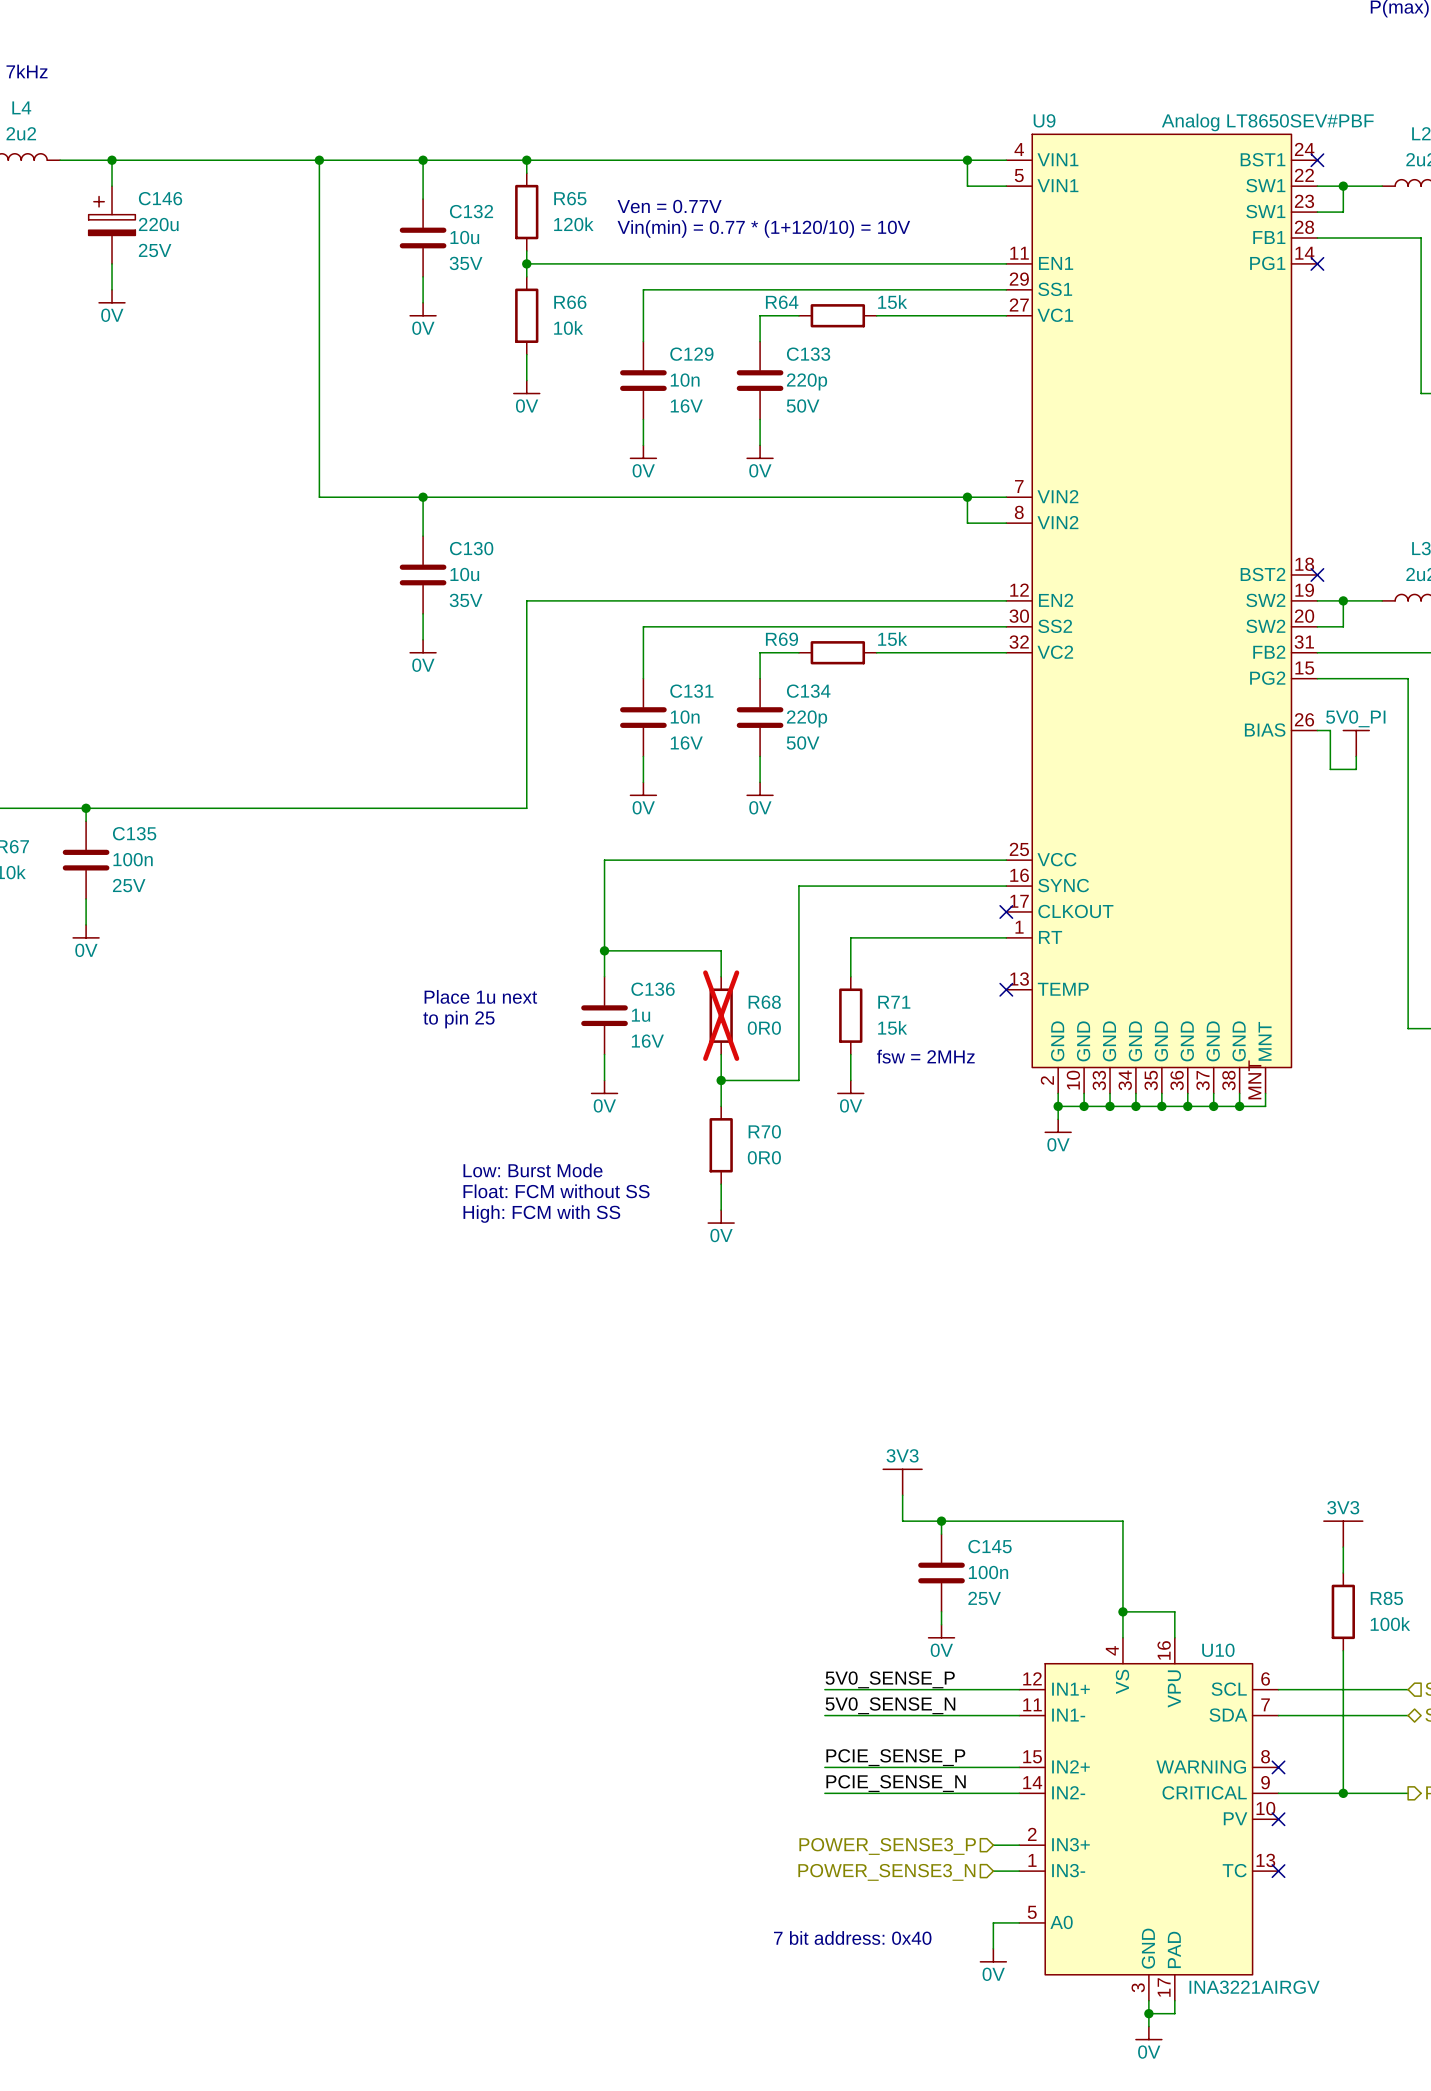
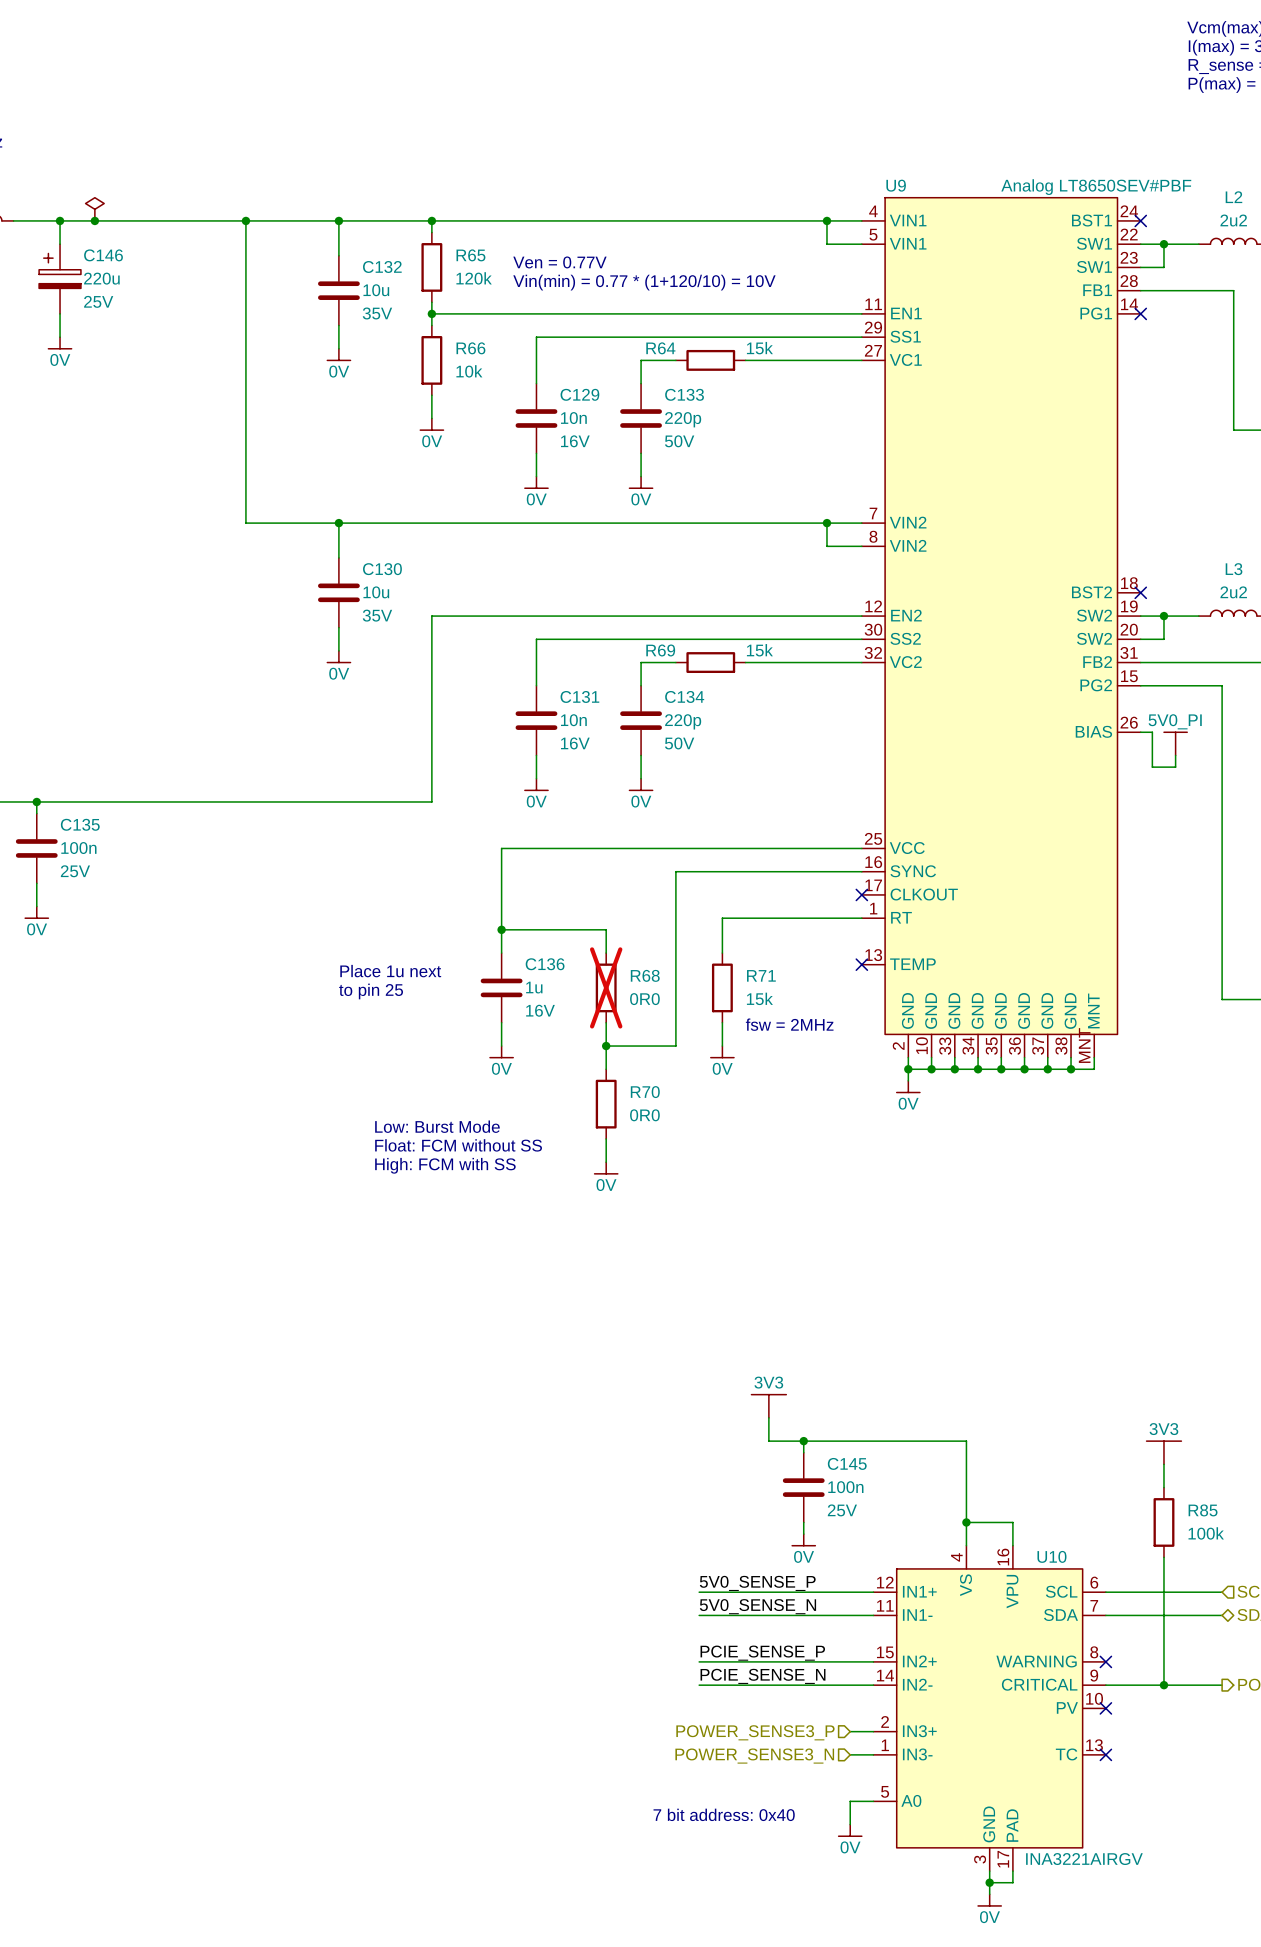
power symbol: none -> (94, 209)
junction: none -> (94, 220)

